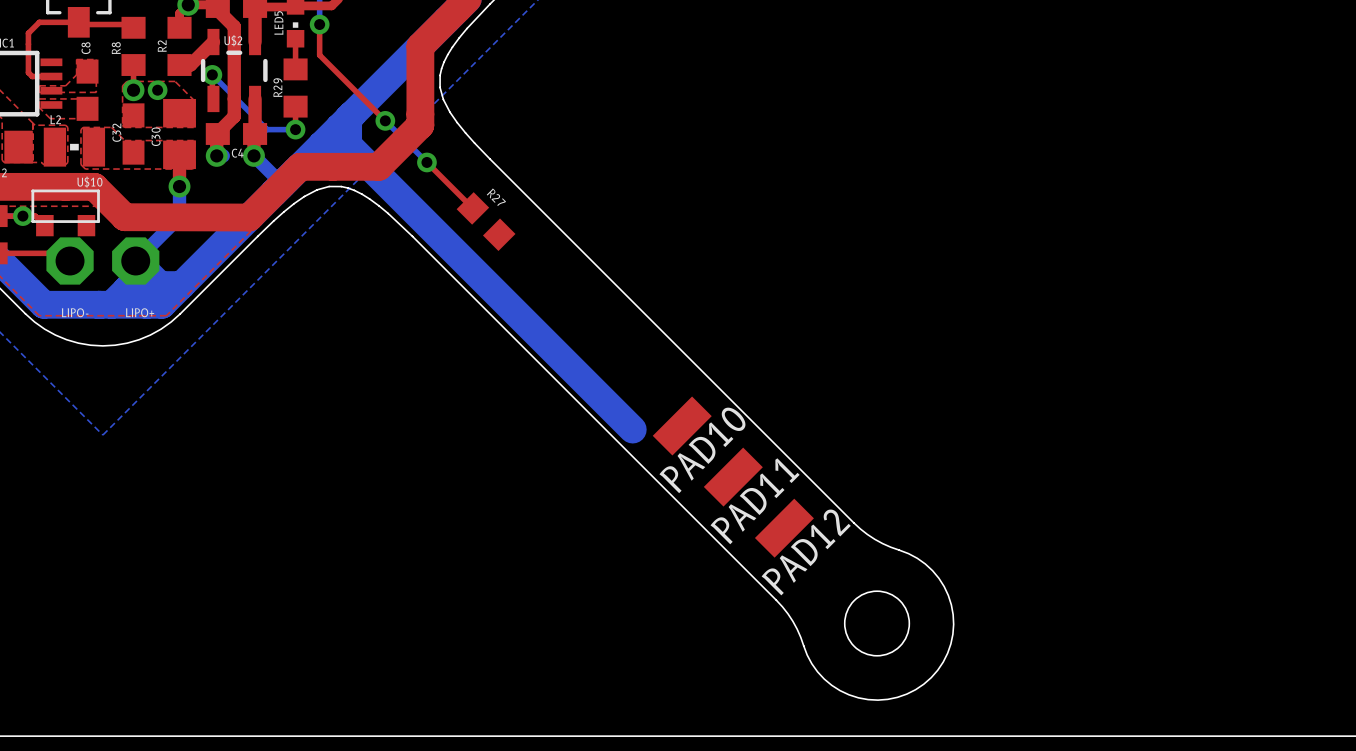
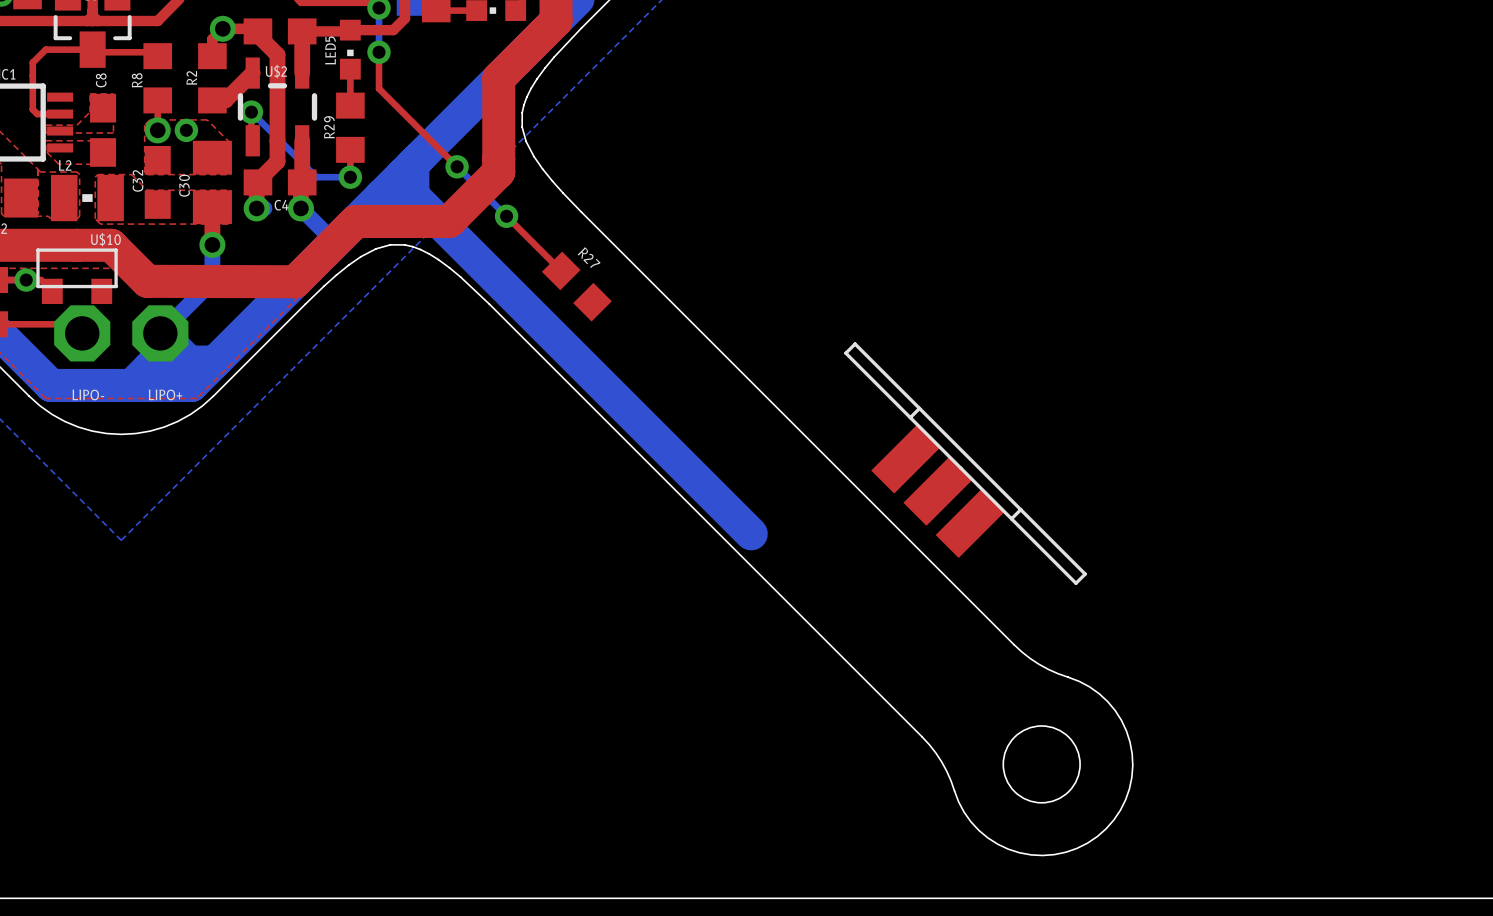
part: none -> (965, 463)
PAD10: (682, 425) -> none
PAD11: (733, 477) -> none
PAD12: (784, 528) -> none

